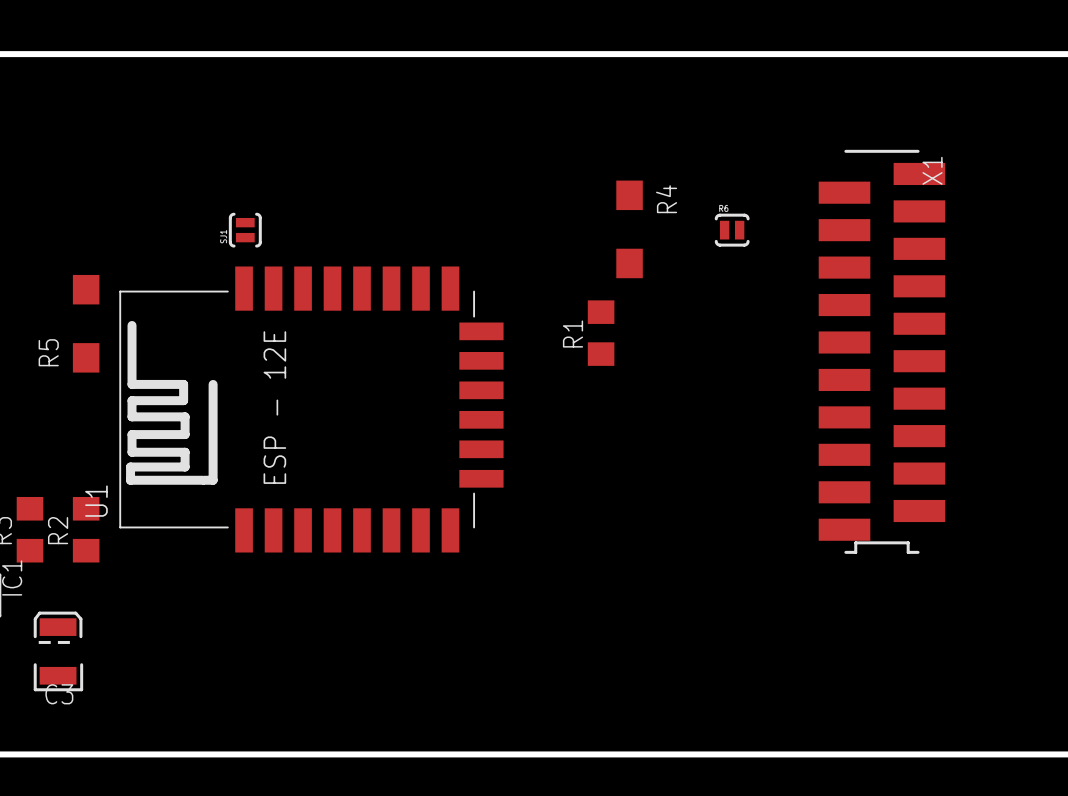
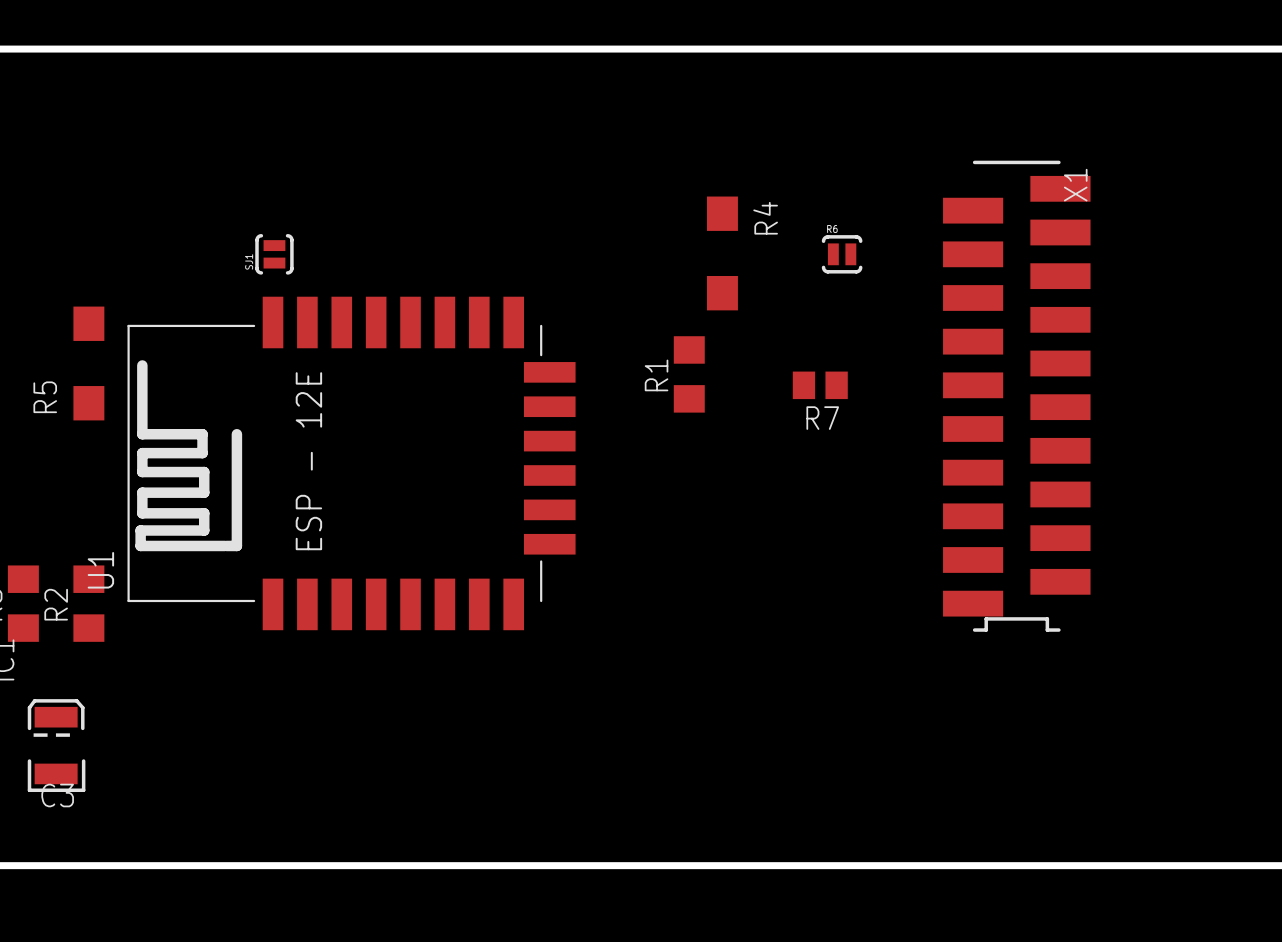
R7: none -> (820, 385)

